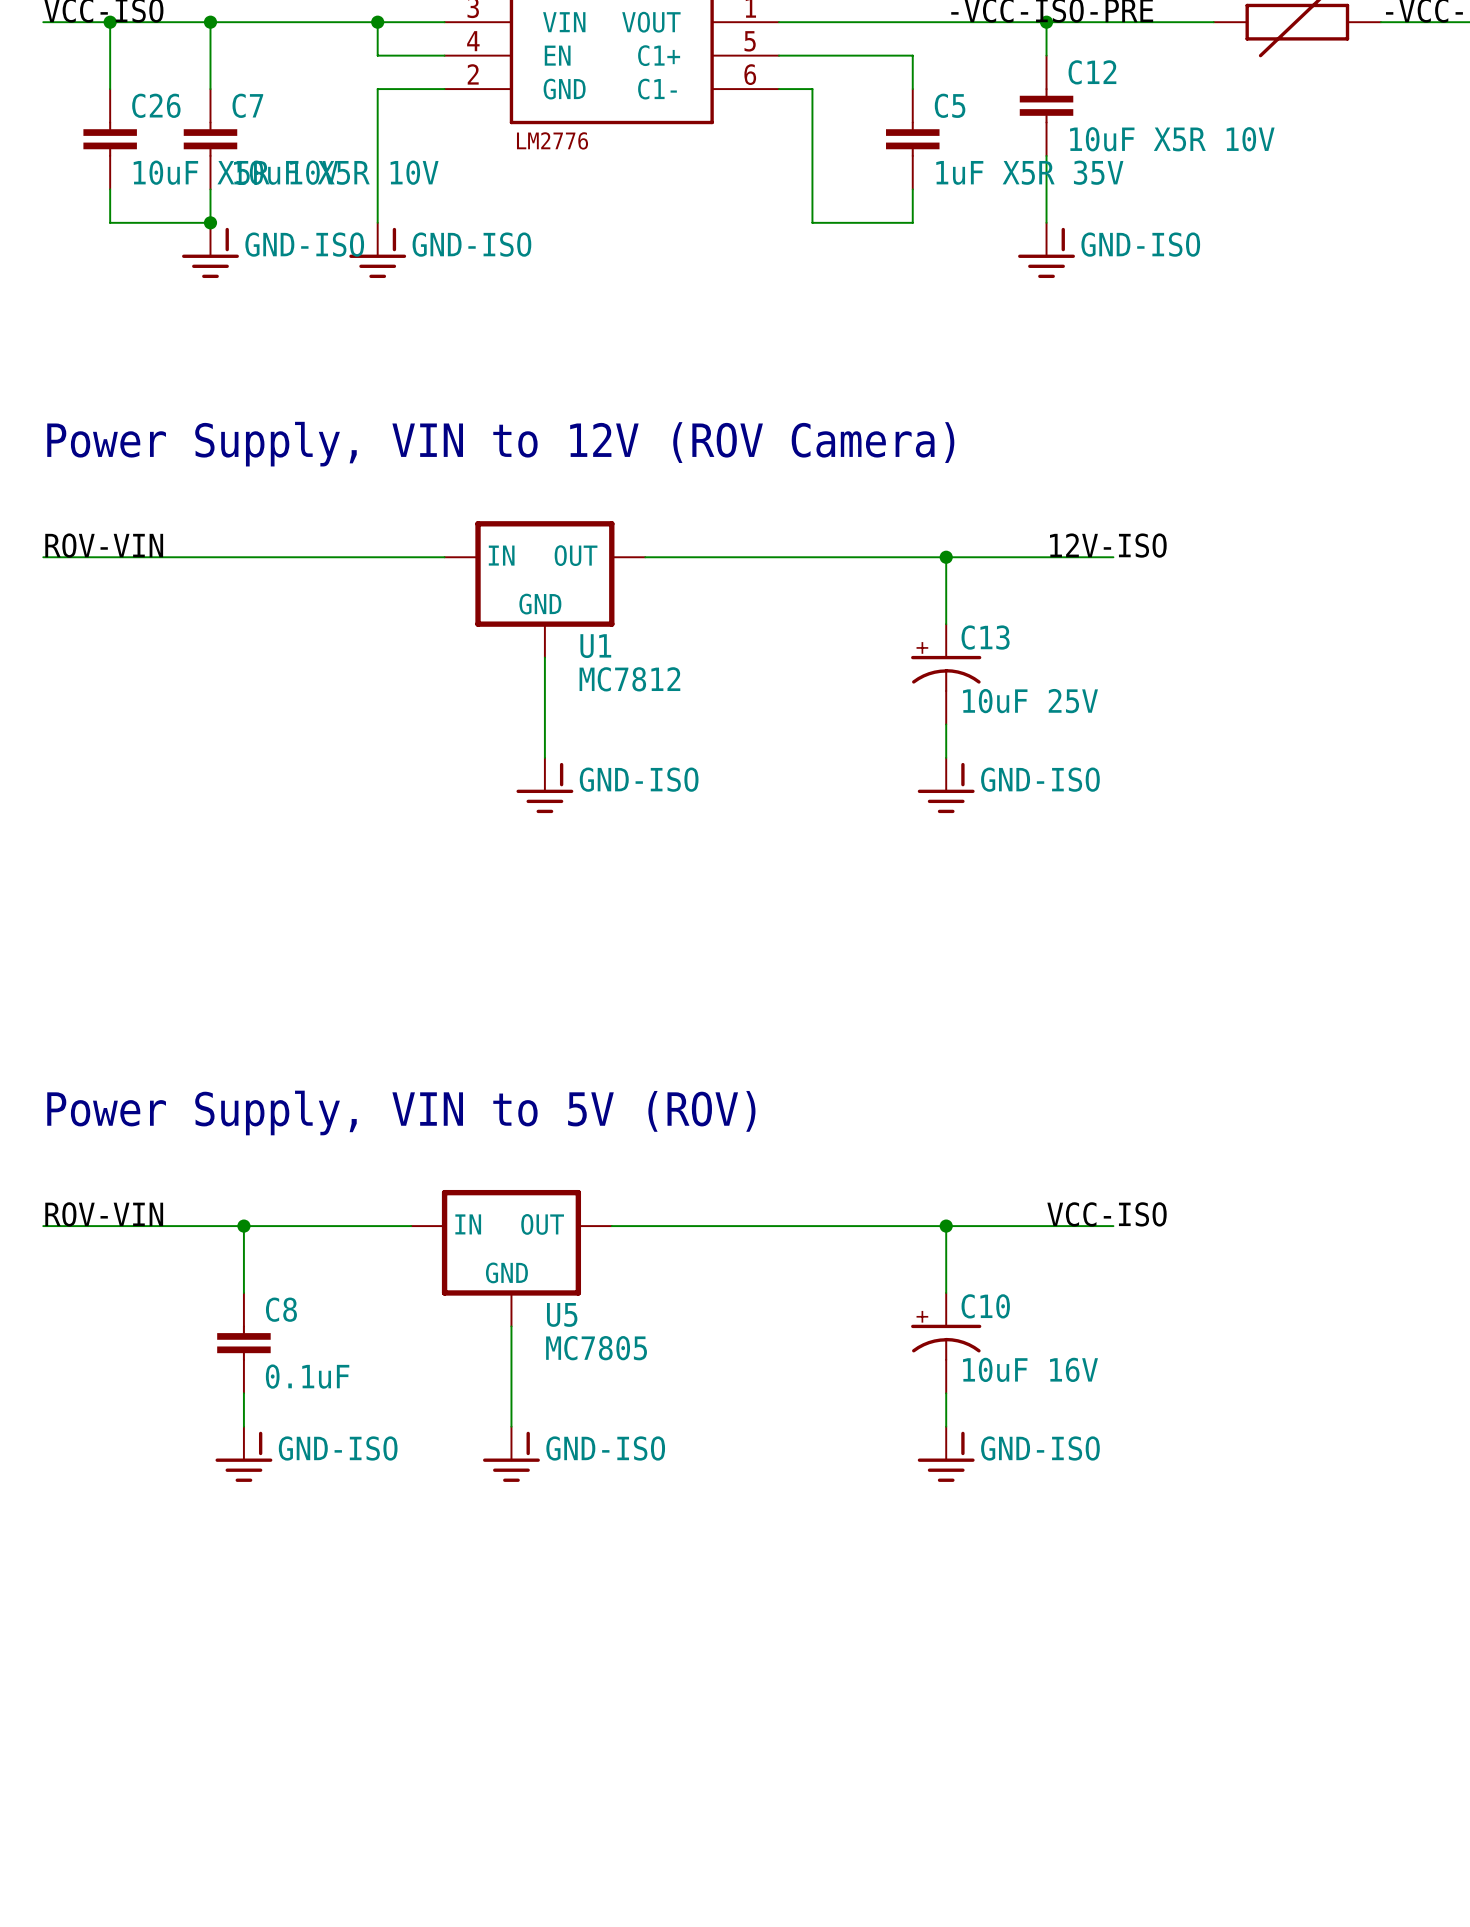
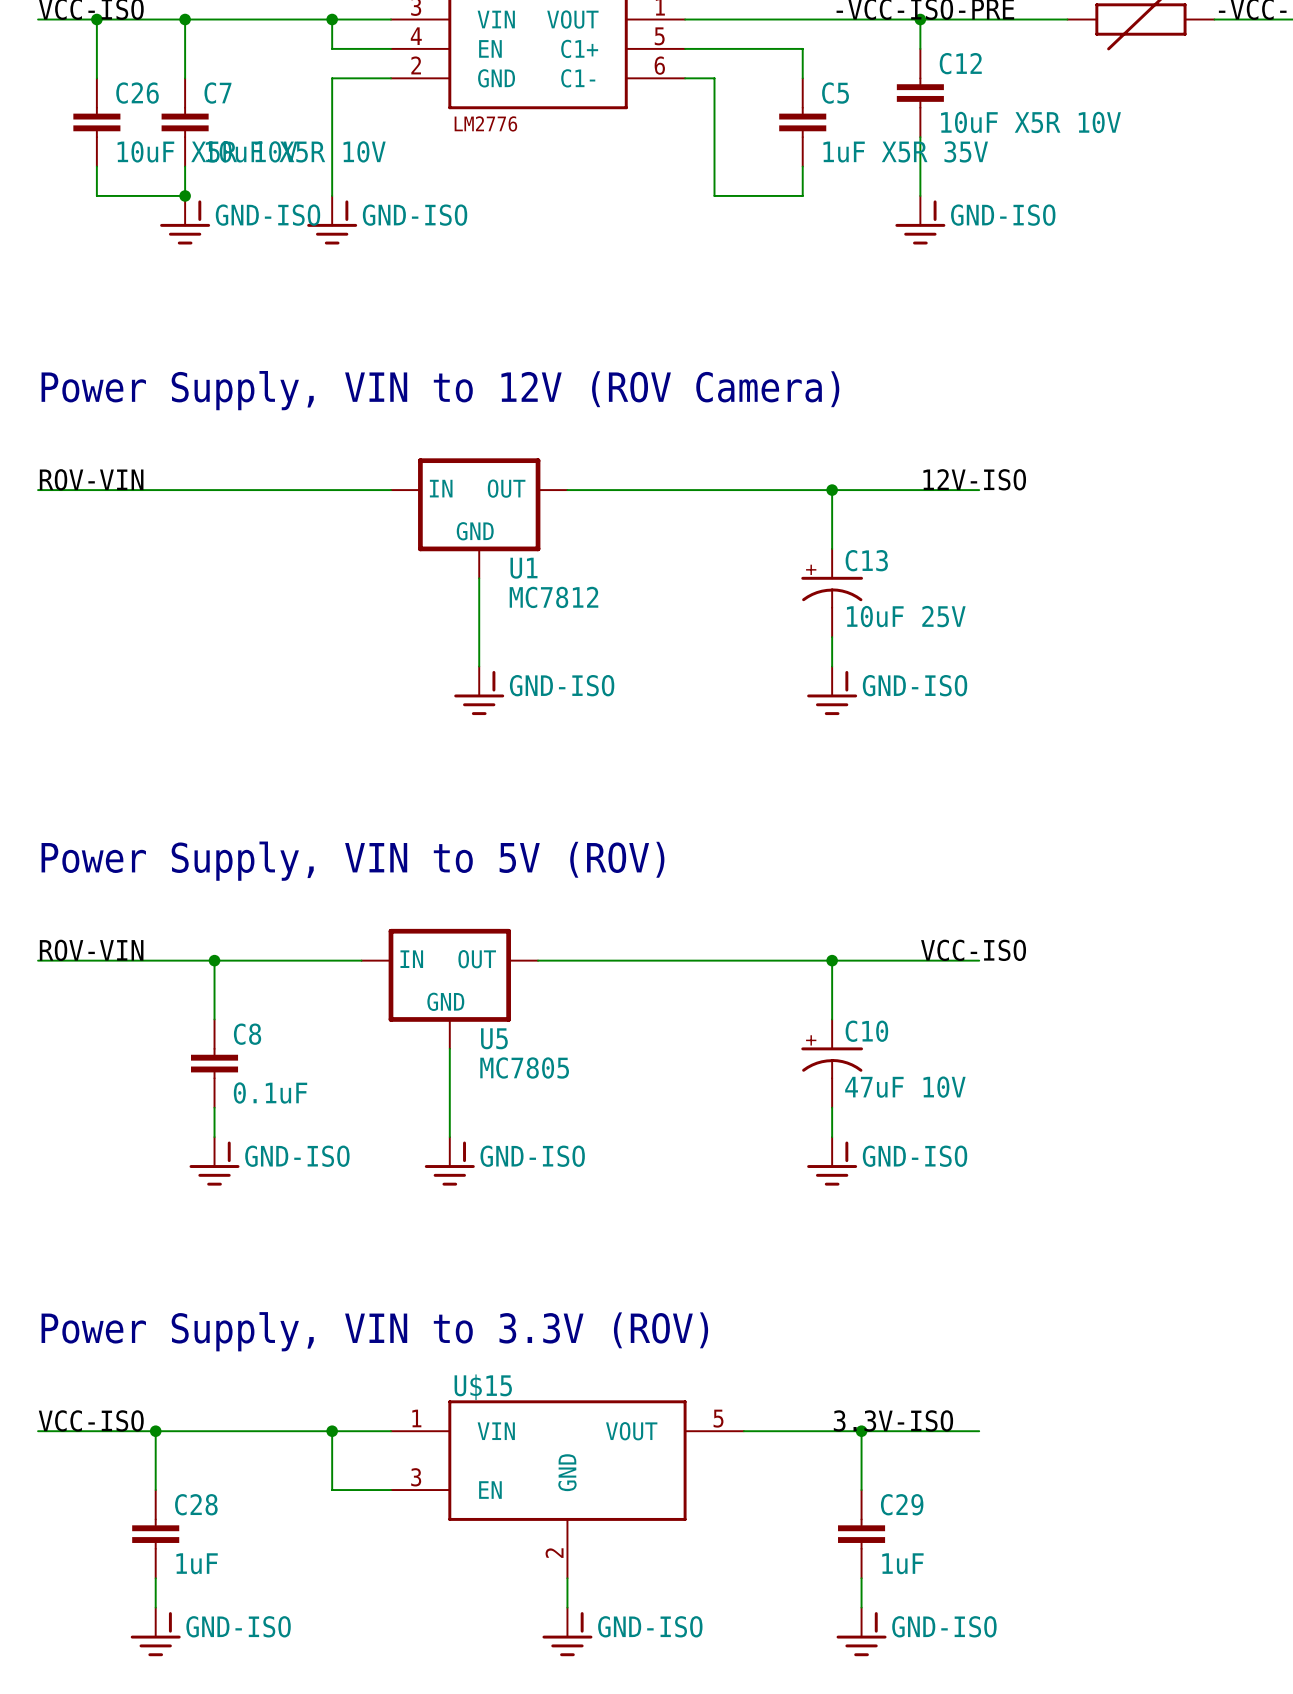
wire: none -> (214, 960) (214, 1019)
junction: none -> (214, 960)
wire: none -> (832, 960) (832, 1019)
junction: none -> (832, 960)
text position: Power Supply, VIN to 5V (ROV) (401, 1112) -> Power Supply, VIN to 5V (ROV) (352, 861)
label position: ROV-VIN (104, 1214) -> ROV-VIN (91, 950)
label position: VCC-ISO (1107, 1214) -> VCC-ISO (973, 950)
wire: (43, 1226) (411, 1226) -> (38, 960) (361, 960)
junction: (243, 1226) -> none
wire: (611, 1226) (1113, 1226) -> (538, 960) (979, 960)
junction: (946, 1226) -> none
U5 position: (511, 1258) -> (449, 988)
wire: (511, 1326) (511, 1426) -> (449, 1048) (449, 1137)
C8 position: (243, 1343) -> (214, 1063)
C10 position: (946, 1343) -> (832, 1063)
C10 value: 10uF 16V (1030, 1369) -> 47uF 10V (905, 1087)
wire: (243, 1393) (243, 1426) -> none
wire: (946, 1393) (946, 1426) -> none
power symbol position: GND-ISO (243, 1454) -> GND-ISO (214, 1161)
power symbol position: GND-ISO (511, 1454) -> GND-ISO (449, 1161)
power symbol position: GND-ISO (946, 1454) -> GND-ISO (832, 1161)
text: none -> Power Supply, VIN to 3.3V (ROV) (374, 1331)
label: none -> VCC-ISO (91, 1420)
label: none -> 3.3V-ISO (893, 1420)
wire: none -> (38, 1431) (390, 1431)
wire: none -> (155, 1431) (155, 1490)
junction: none -> (155, 1431)
wire: none -> (332, 1431) (332, 1490) (390, 1490)
junction: none -> (332, 1431)
wire: none -> (743, 1431) (979, 1431)
wire: none -> (861, 1431) (861, 1490)
junction: none -> (861, 1431)
U$15: none -> (567, 1489)
C28: none -> 1uF (155, 1534)
C29: none -> 1uF (861, 1534)
wire: none -> (155, 1578) (155, 1607)
wire: none -> (567, 1578) (567, 1607)
wire: none -> (861, 1578) (861, 1607)
power symbol: none -> GND-ISO (155, 1631)
power symbol: none -> GND-ISO (567, 1631)
power symbol: none -> GND-ISO (861, 1631)

